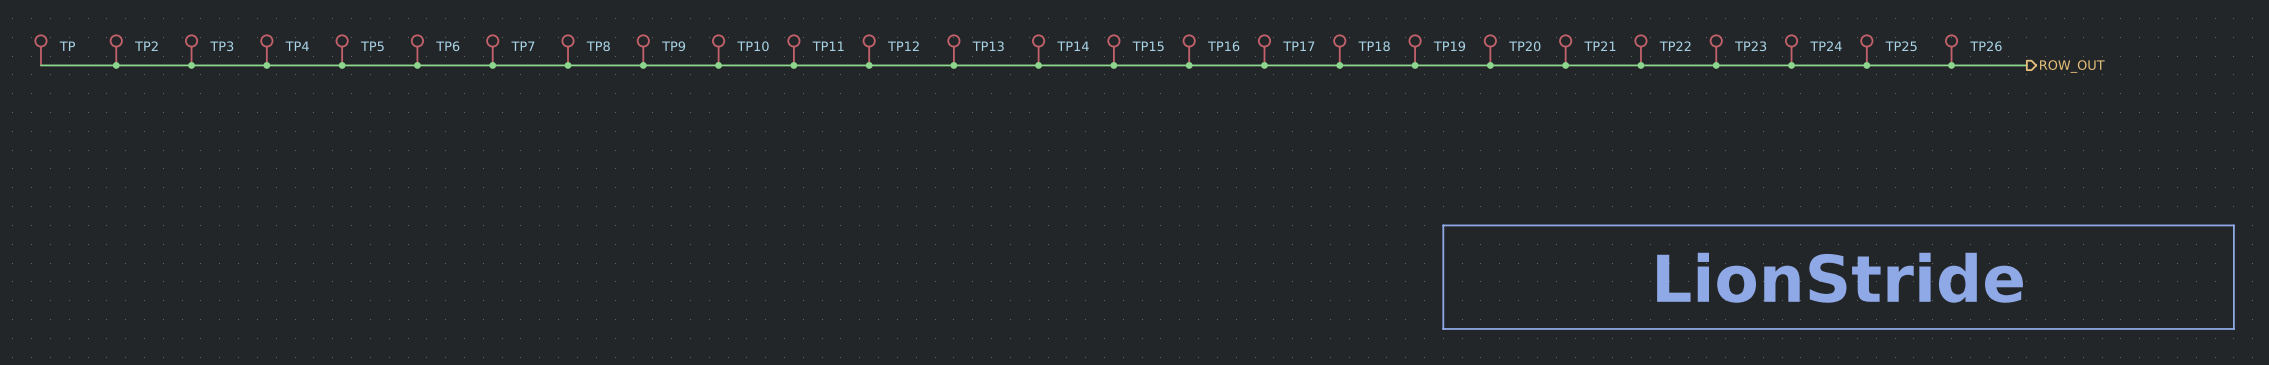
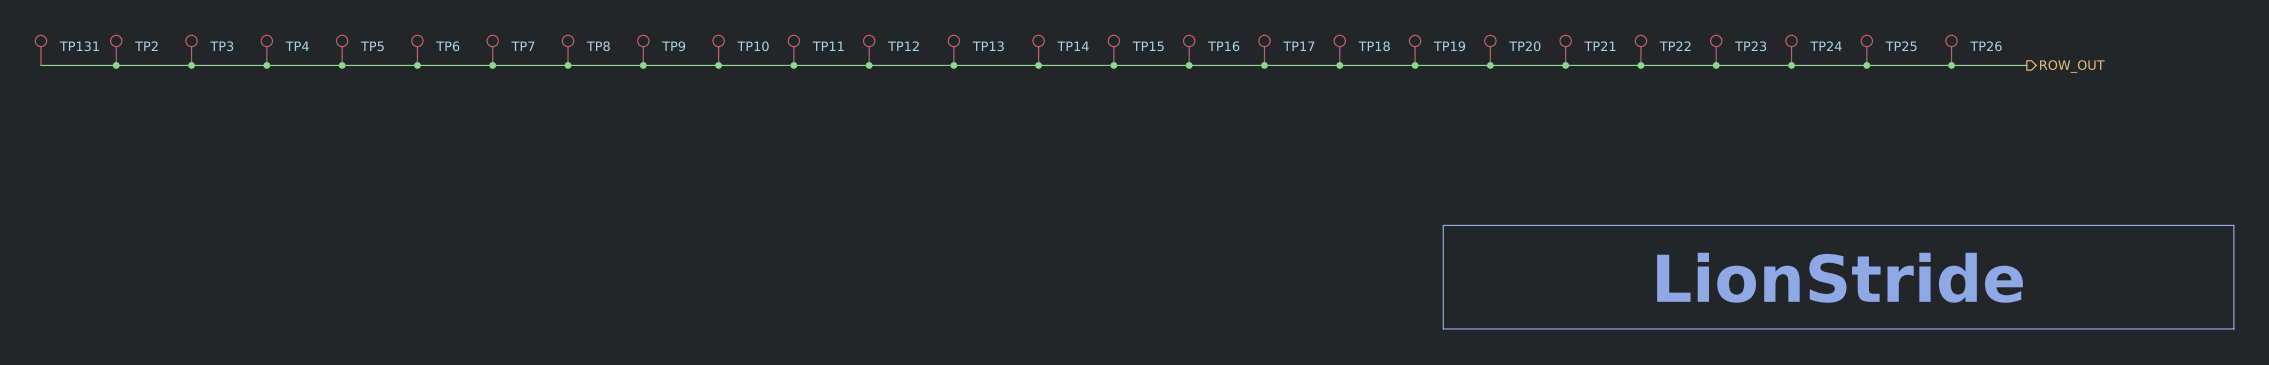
TP name: TP (67, 46) -> TP131 (79, 46)

